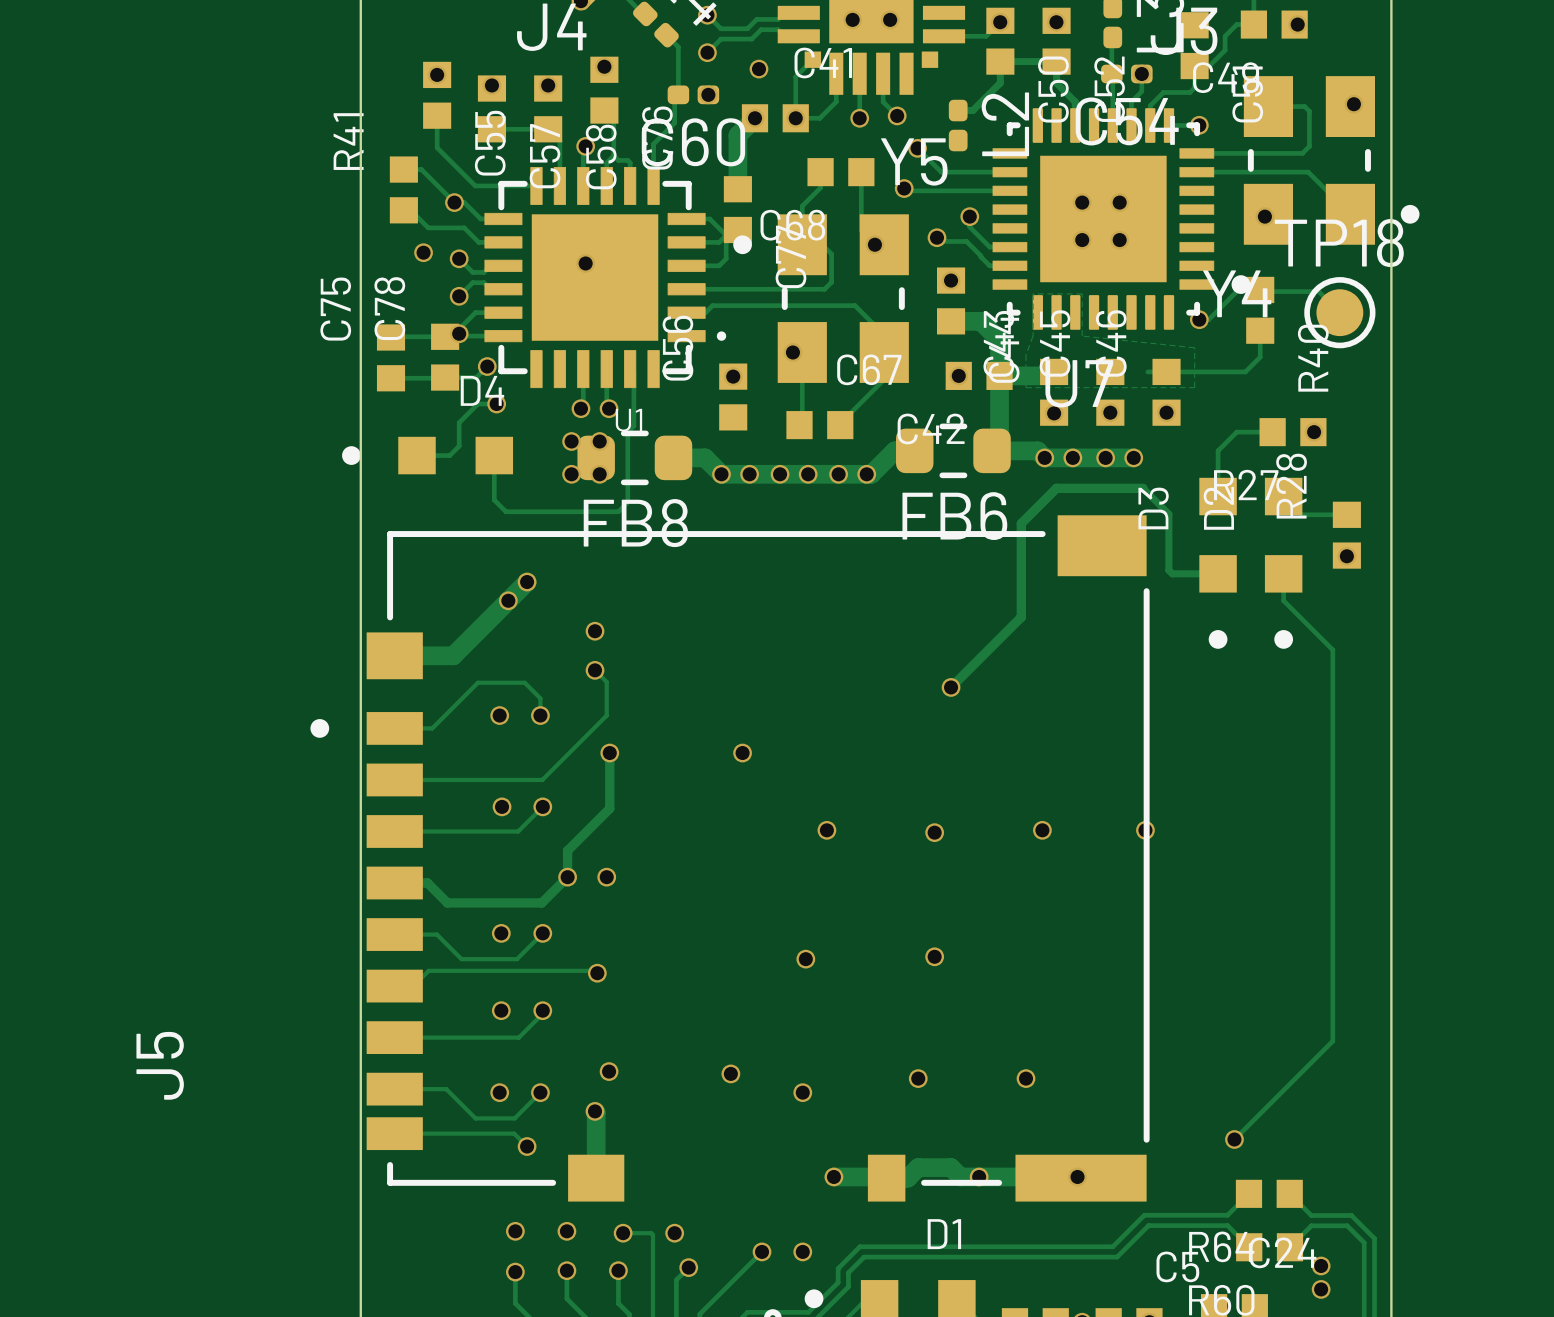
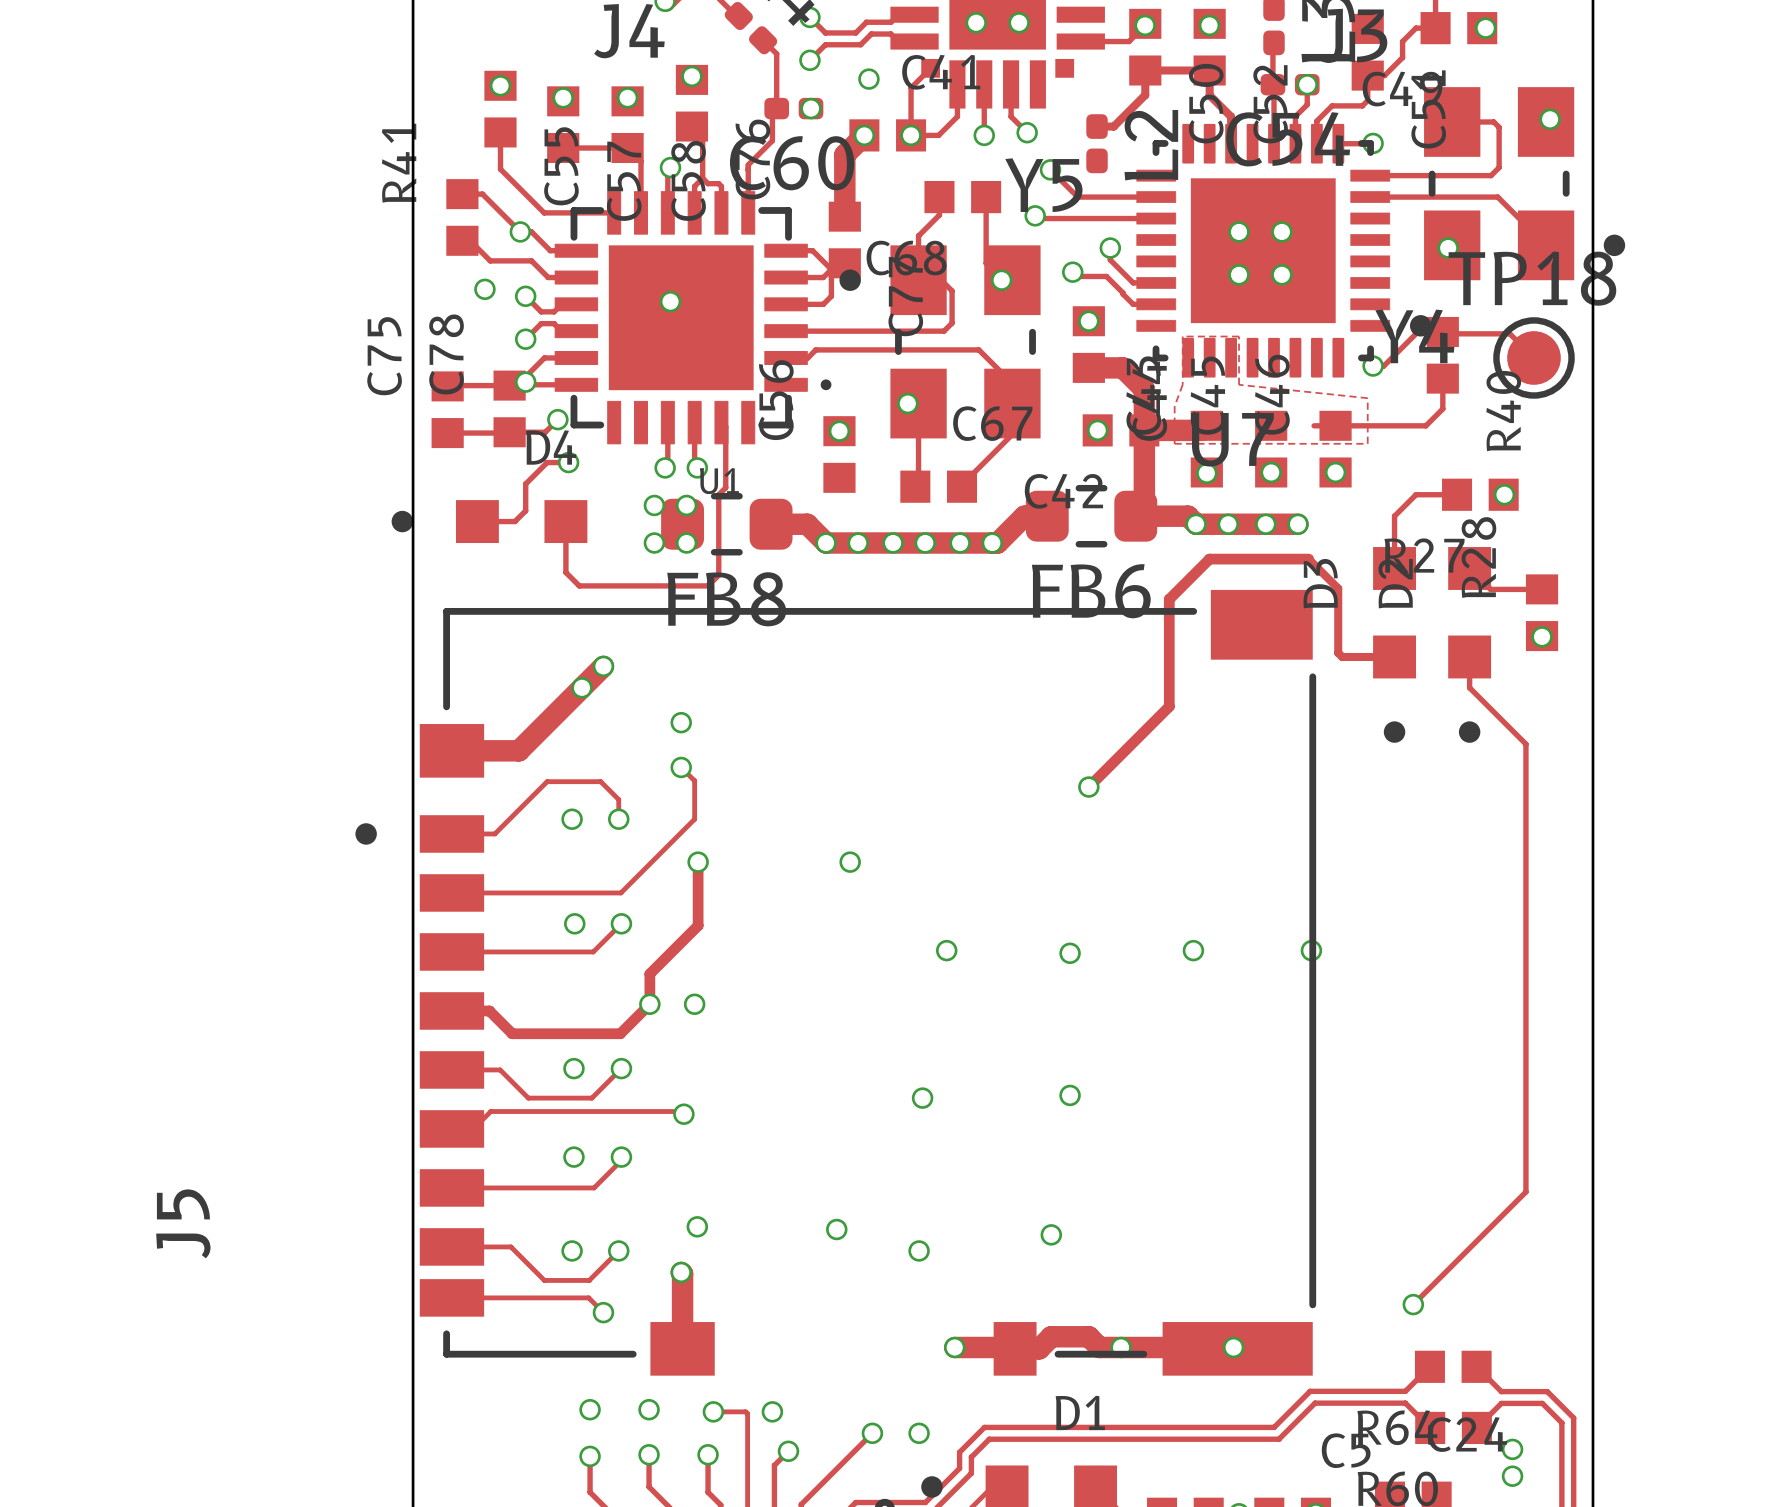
via: (1026, 1078) -> none

